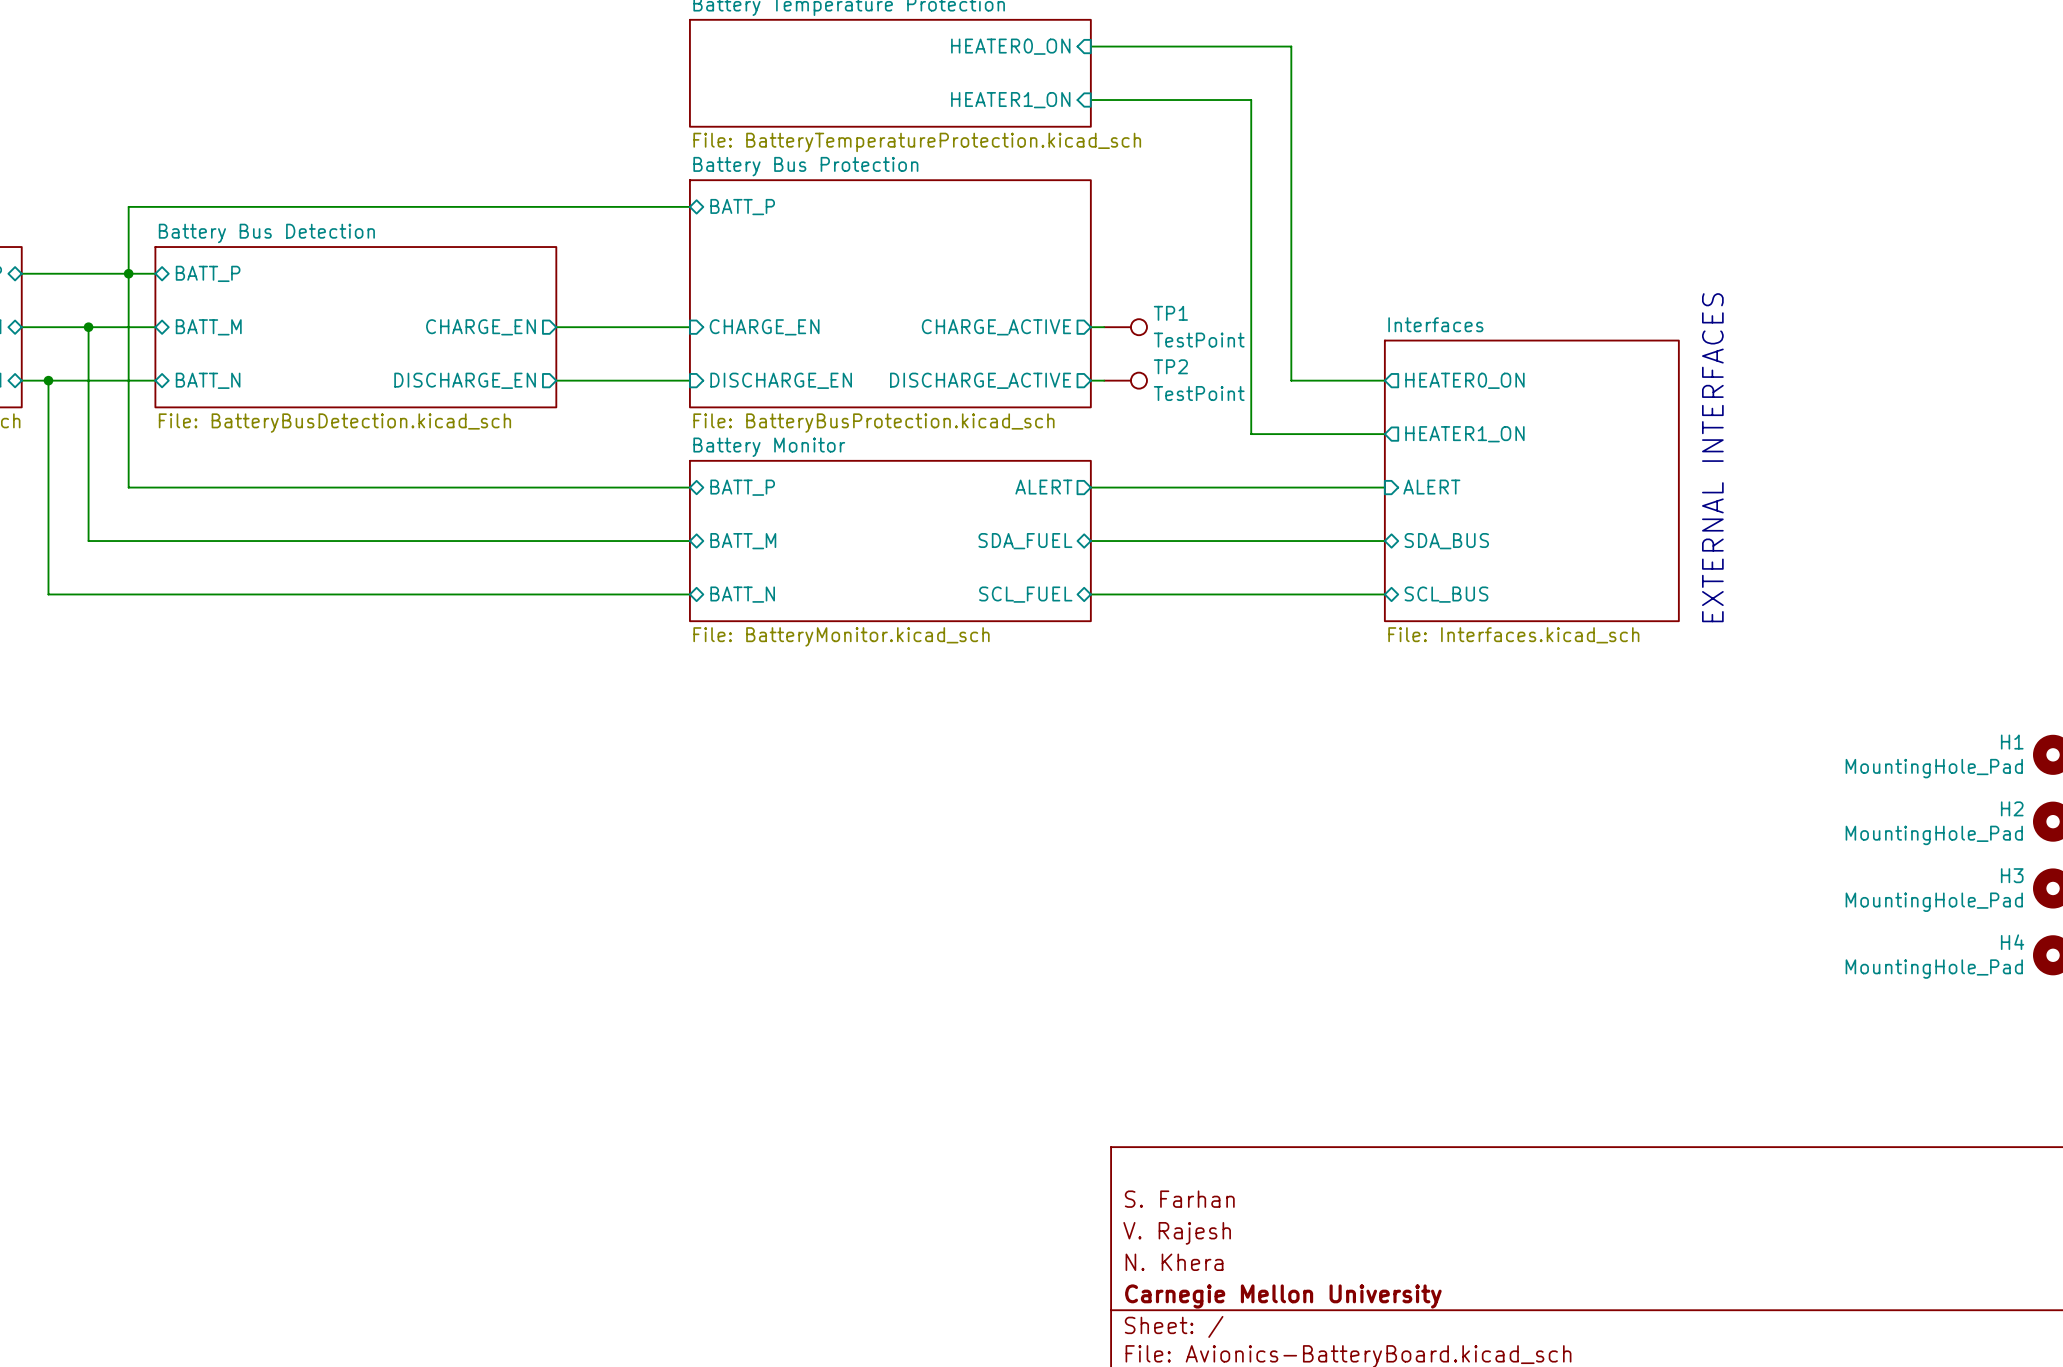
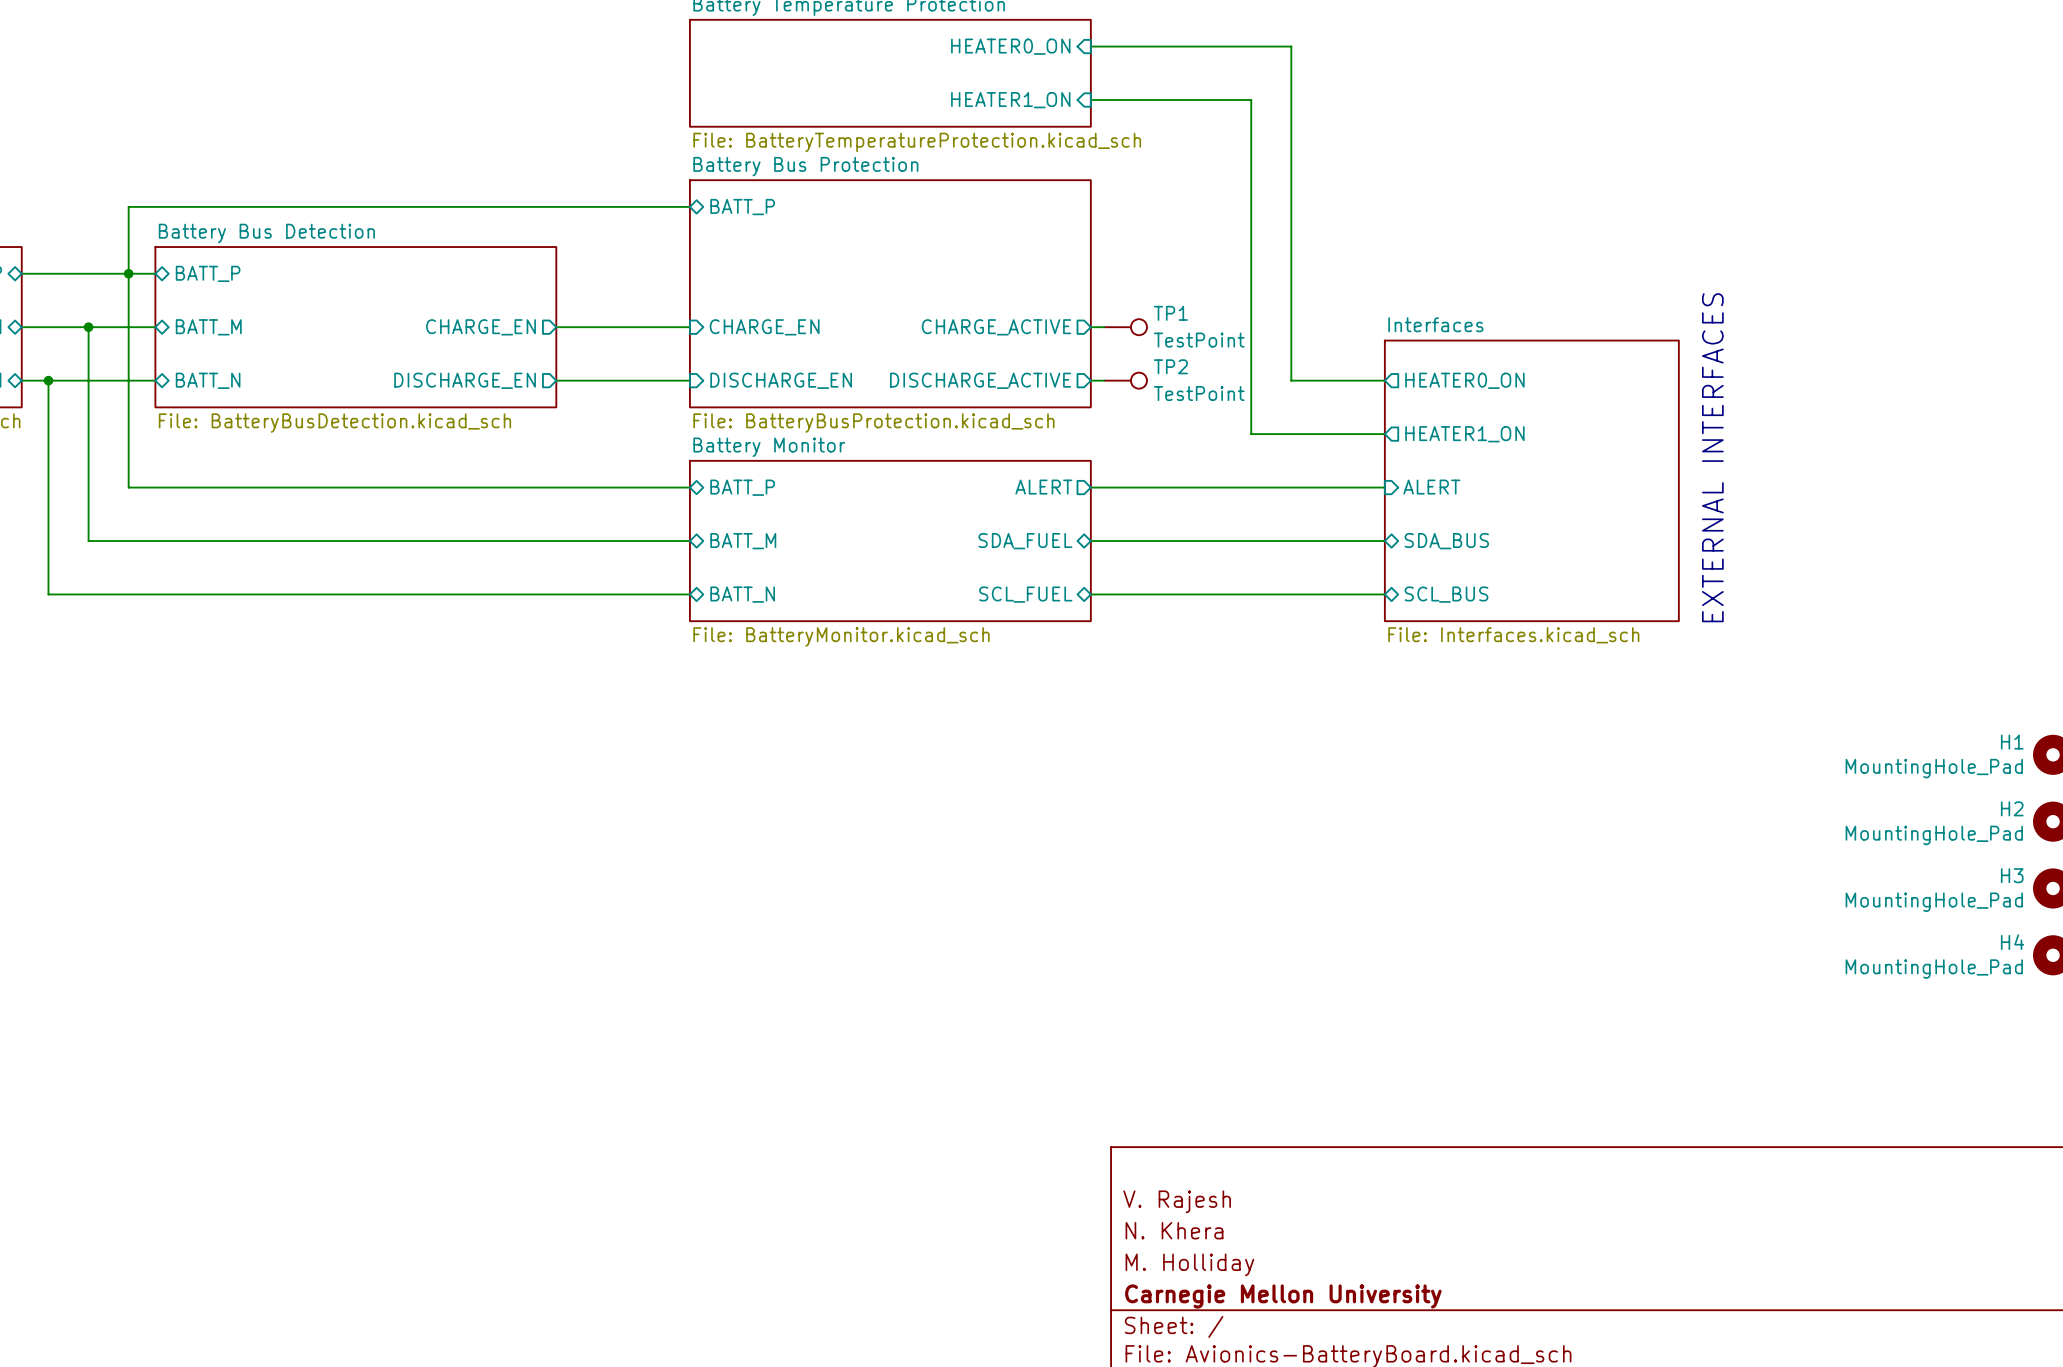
title block: S. Farhan (1179, 1199) -> V. Rajesh (1177, 1201)
title block: V. Rajesh (1177, 1233) -> N. Khera (1174, 1230)
title block: N. Khera (1174, 1262) -> M. Holliday (1189, 1264)

